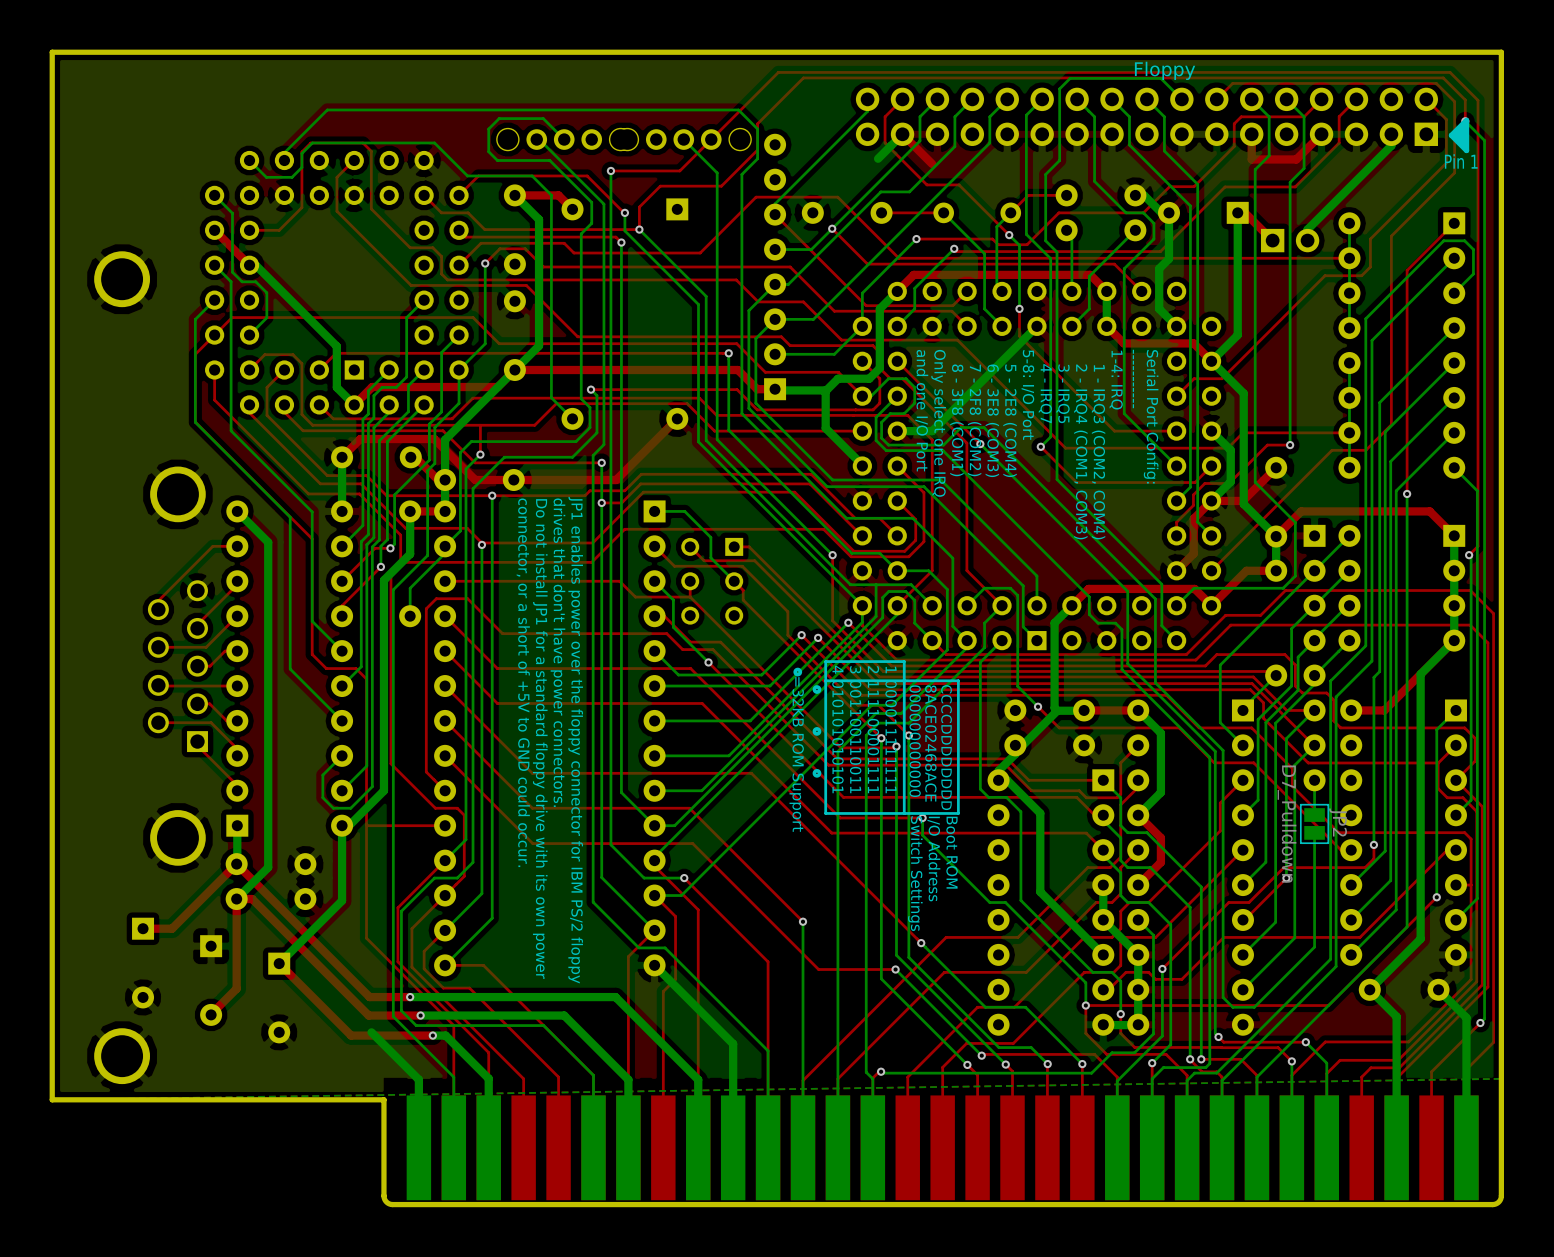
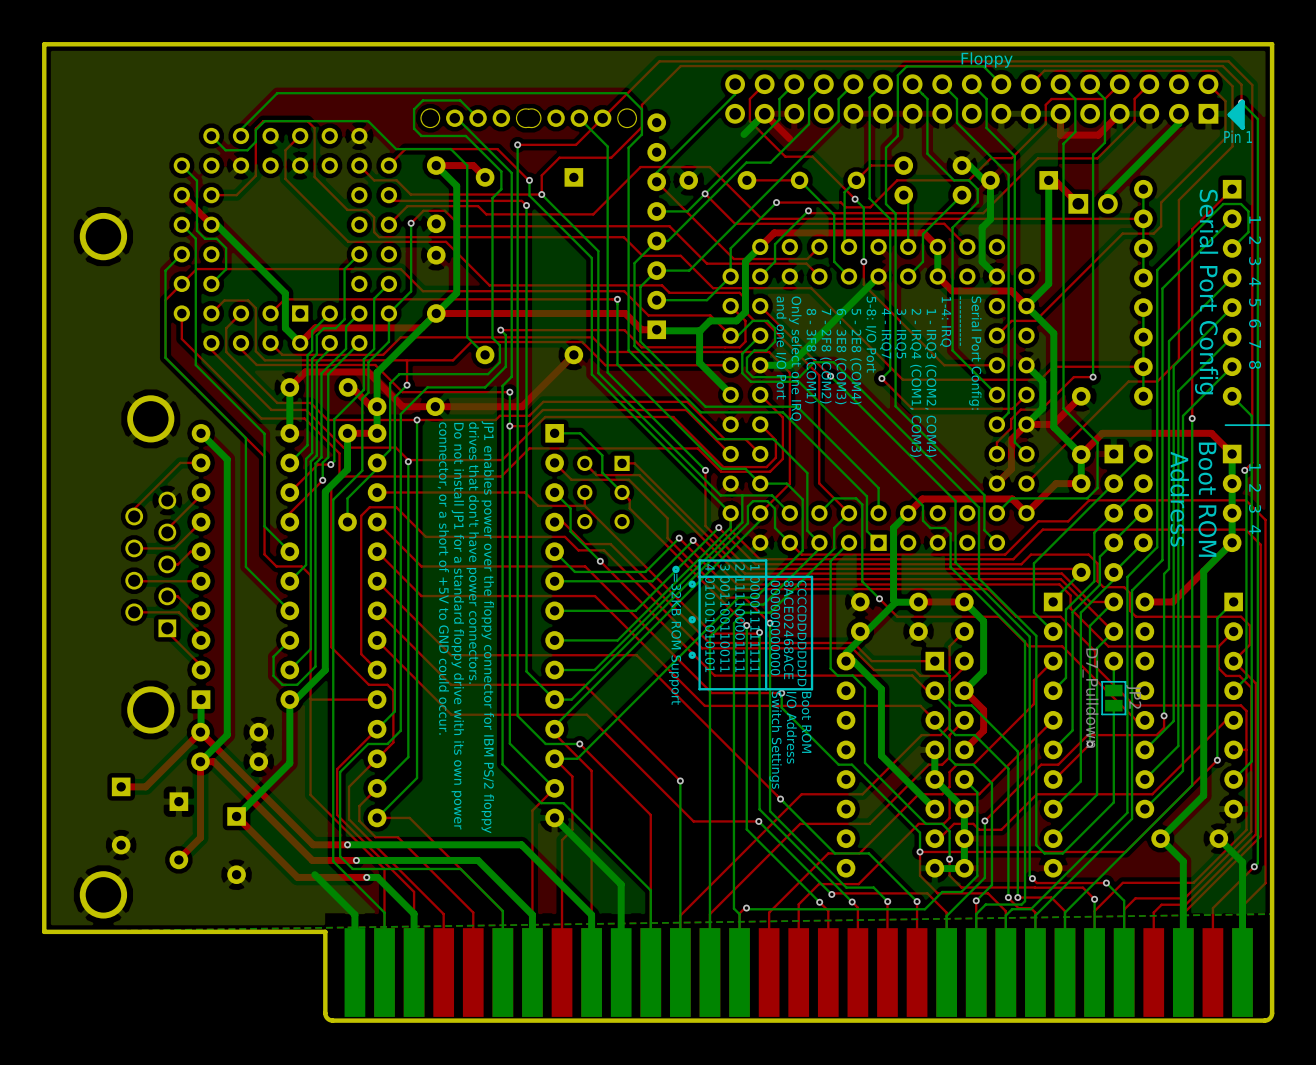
text: none -> Serial Port Config (1206, 292)
text: none -> 1 2 3 4 5 6 7 8 (1255, 292)
line: none -> (1270, 425) (1225, 425)
text: none -> 1 2 3 4 (1255, 498)
text: none -> Address (1179, 499)
text: none -> Boot ROM (1207, 499)

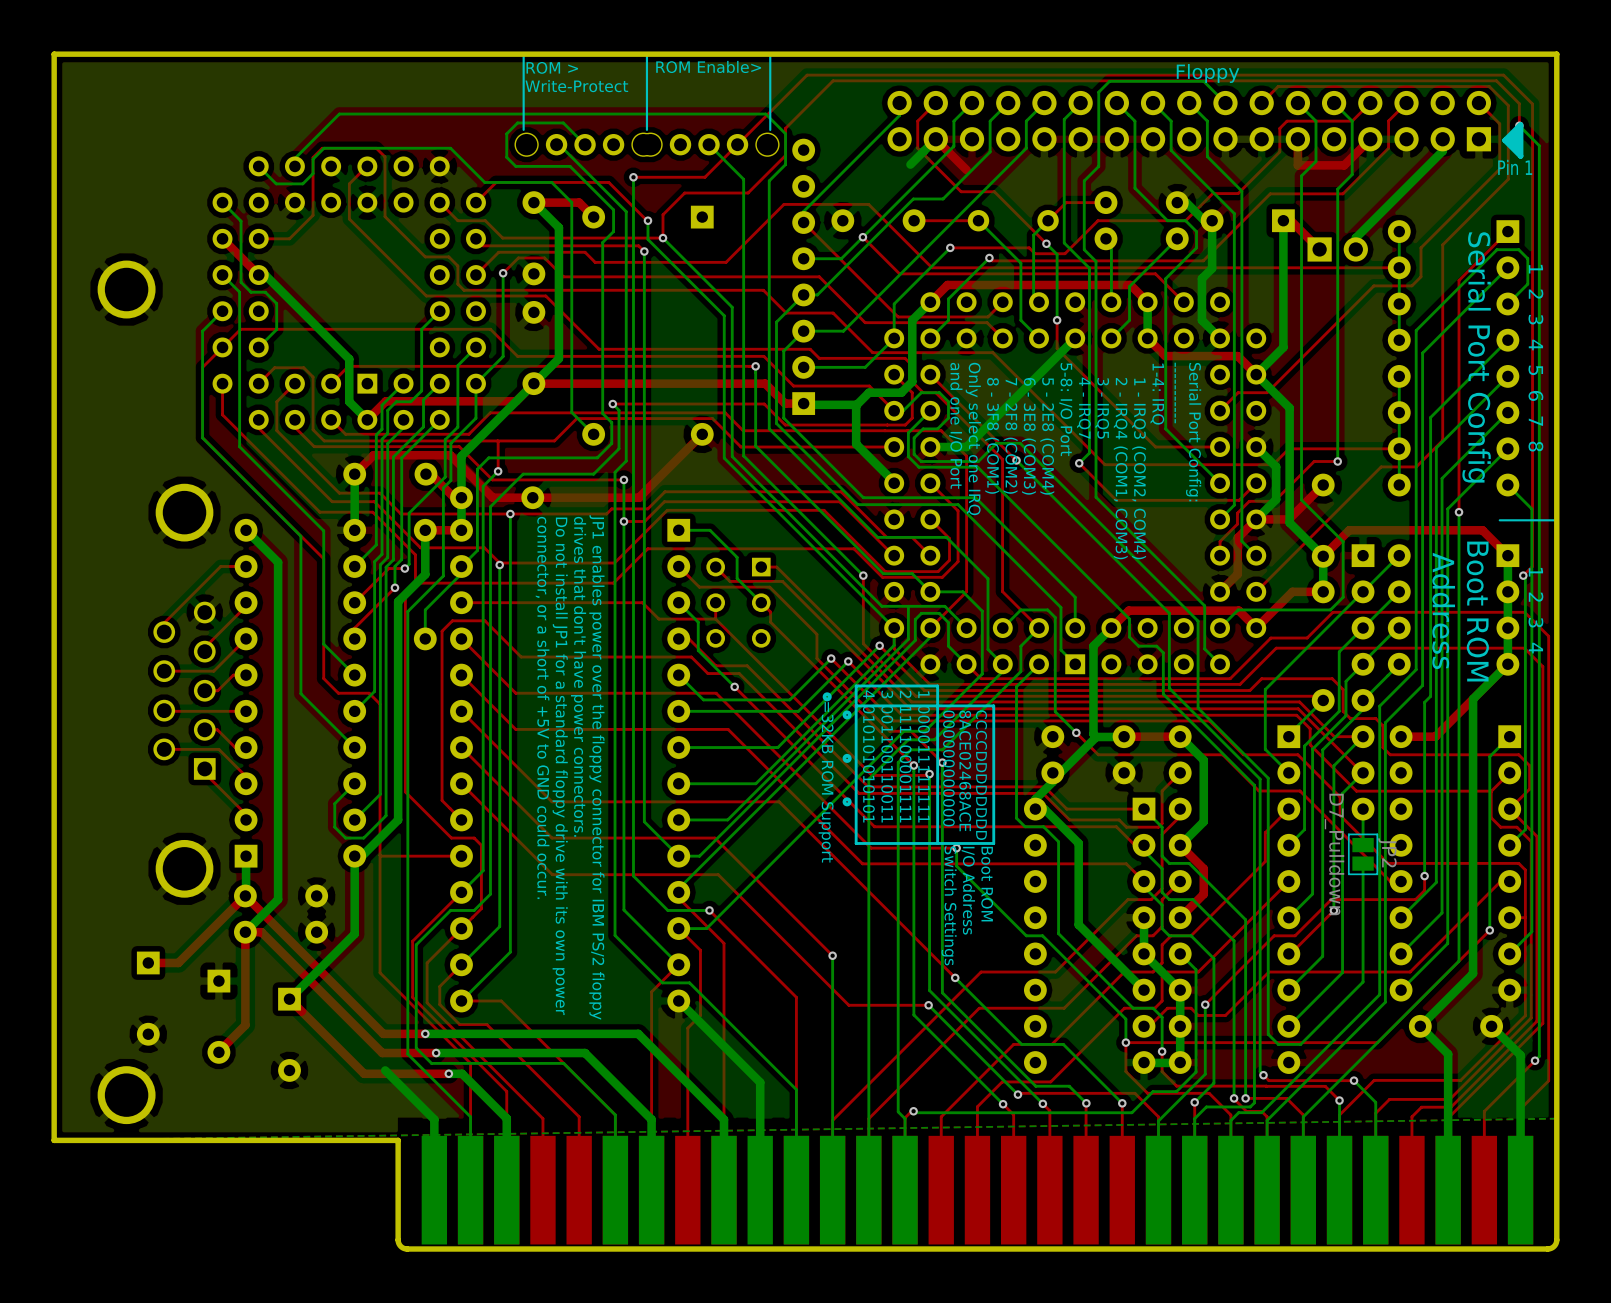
line: none -> (523, 55) (523, 129)
line: none -> (646, 55) (646, 129)
line: none -> (770, 55) (770, 129)
text: none -> ROM Enable> (708, 66)
text: none -> ROM > (552, 67)
text: none -> Write-Protect (576, 86)

